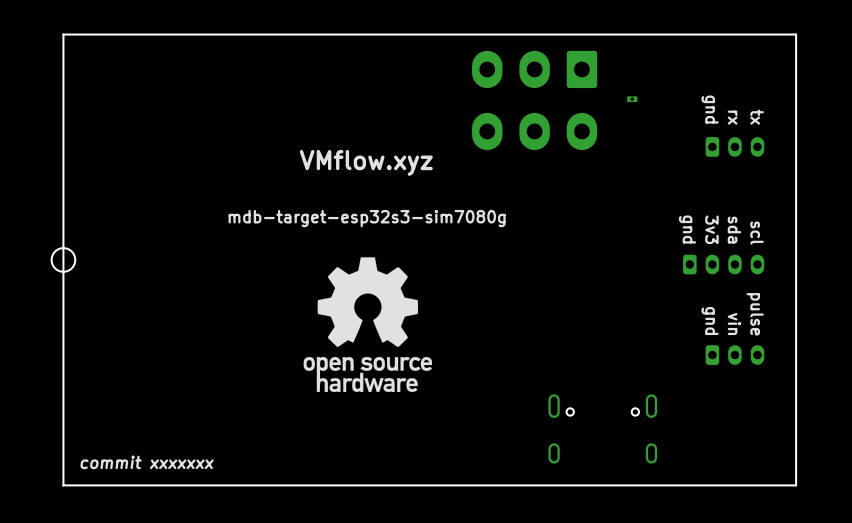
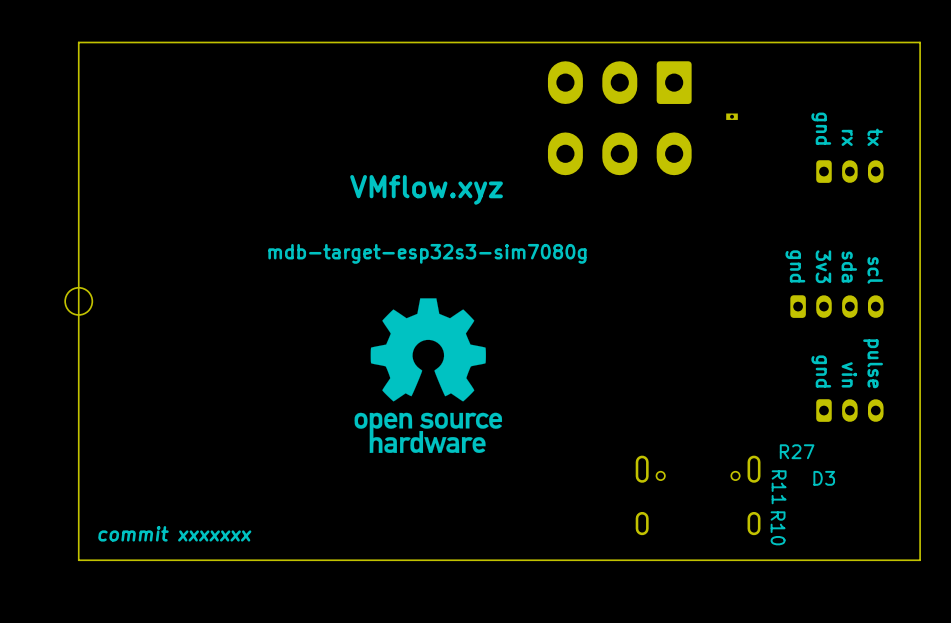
R27: none -> (797, 451)
D3: none -> (824, 478)
R11: none -> (779, 487)
R10: none -> (778, 528)

